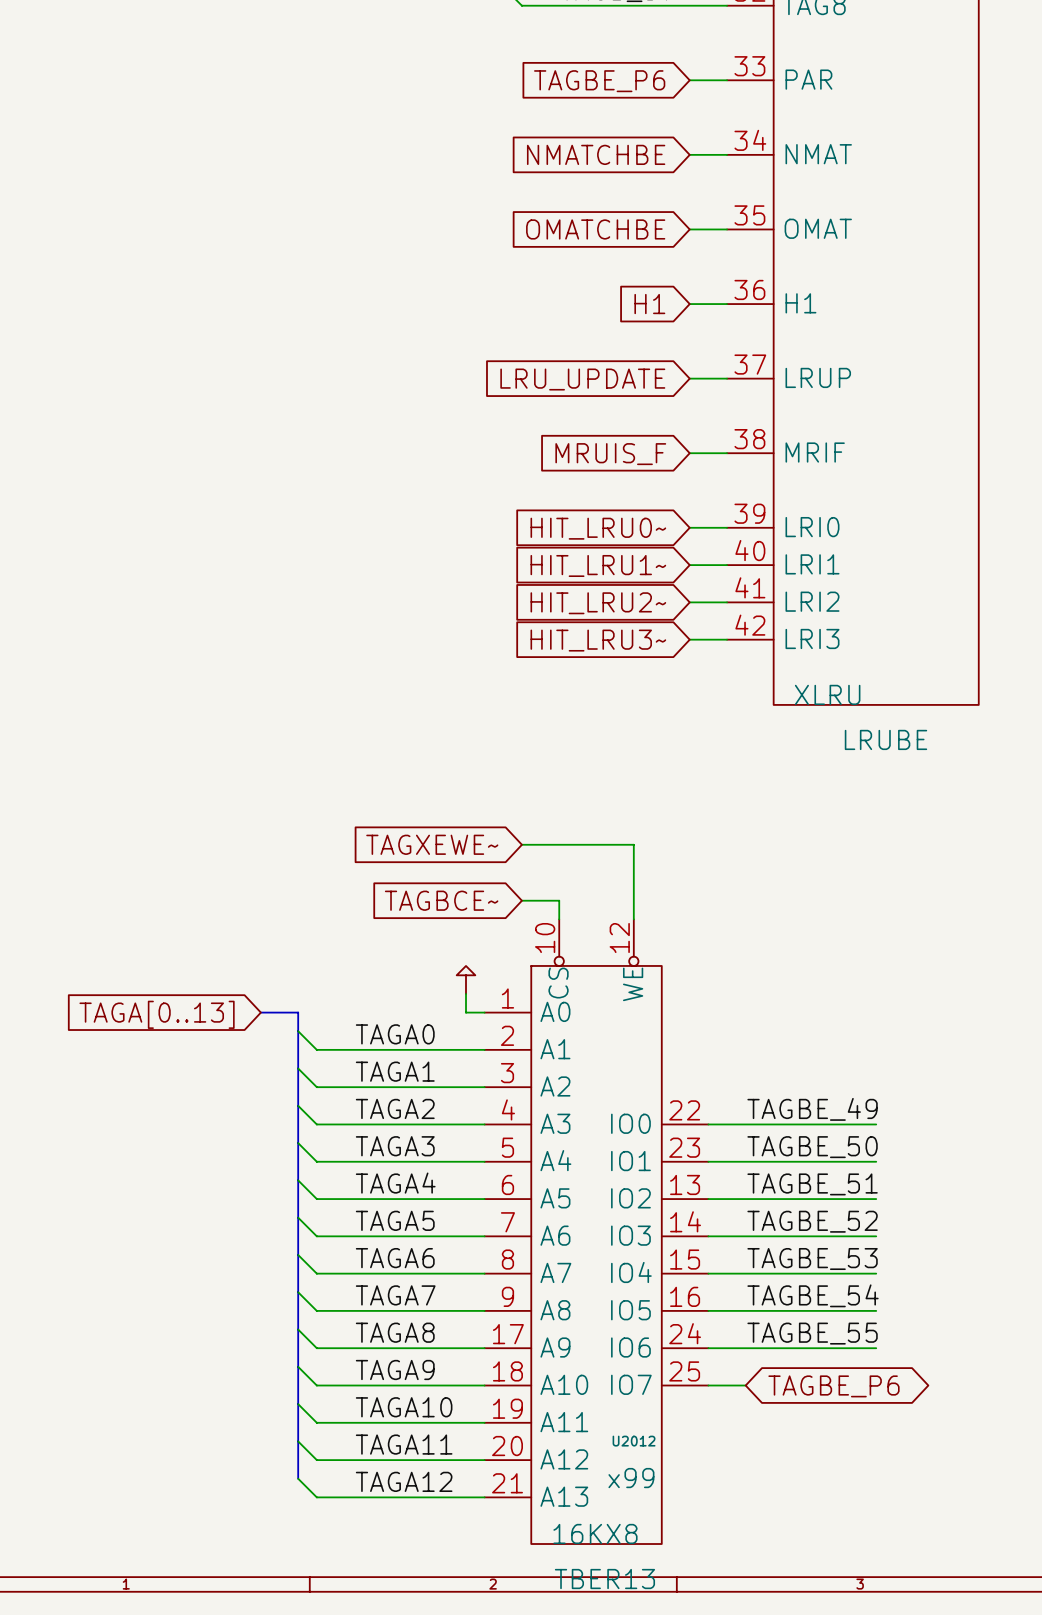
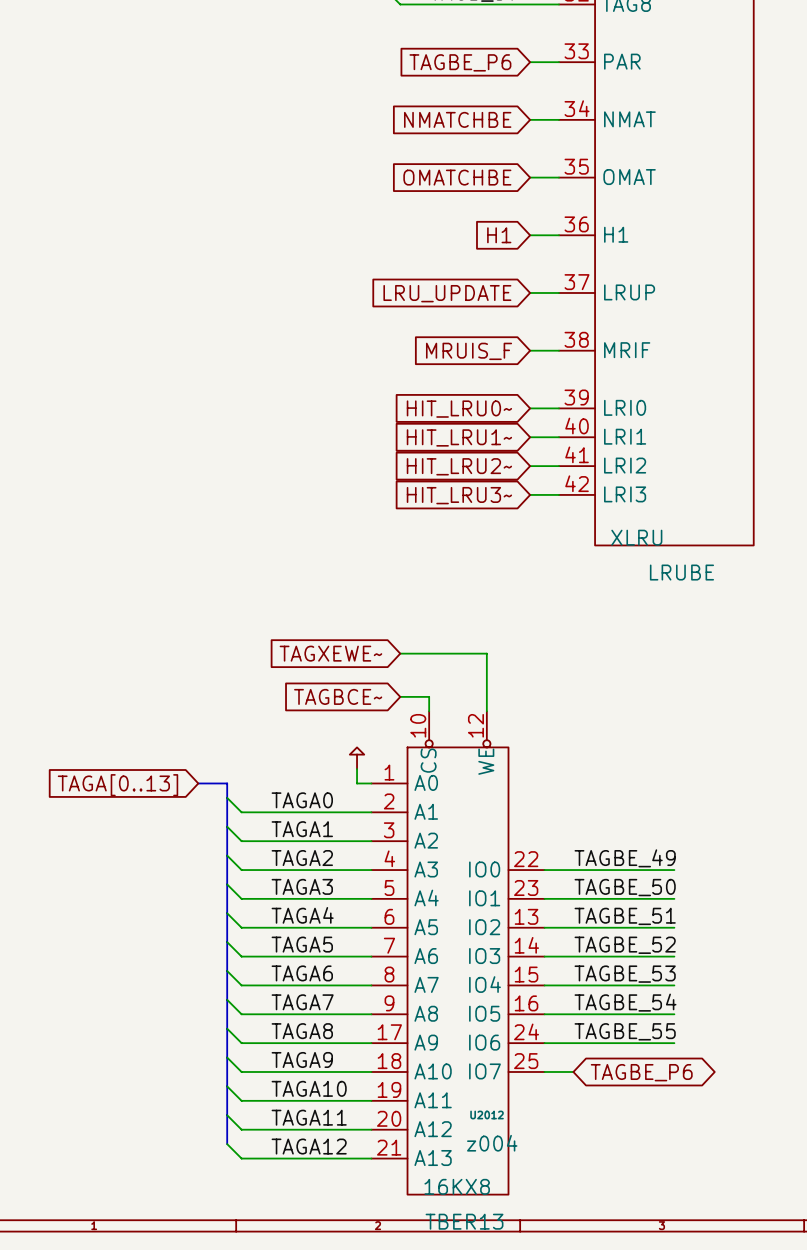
U2012 text: x99 (631, 1478) -> z004 (492, 1143)

